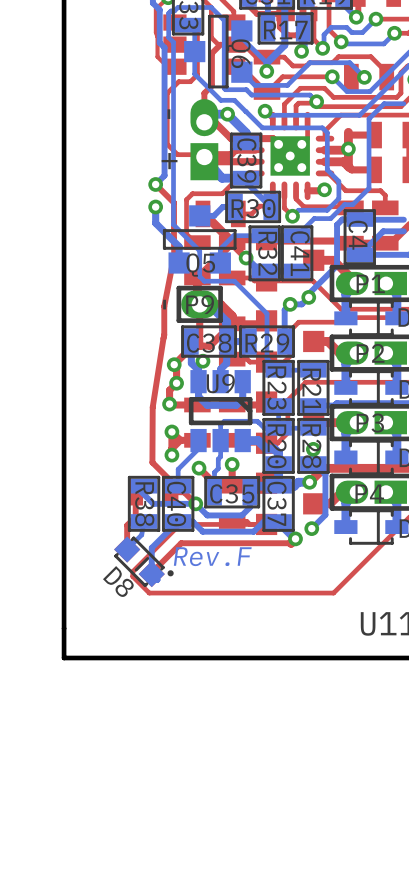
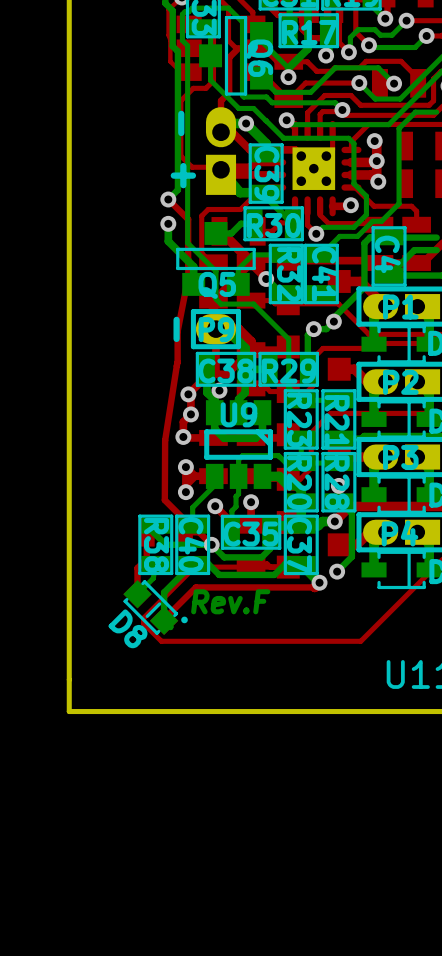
via: none -> (374, 141)
top track: (374, 135) (351, 135) -> none
top track: (349, 167) (351, 169) (374, 169) -> none
via: none -> (378, 181)

